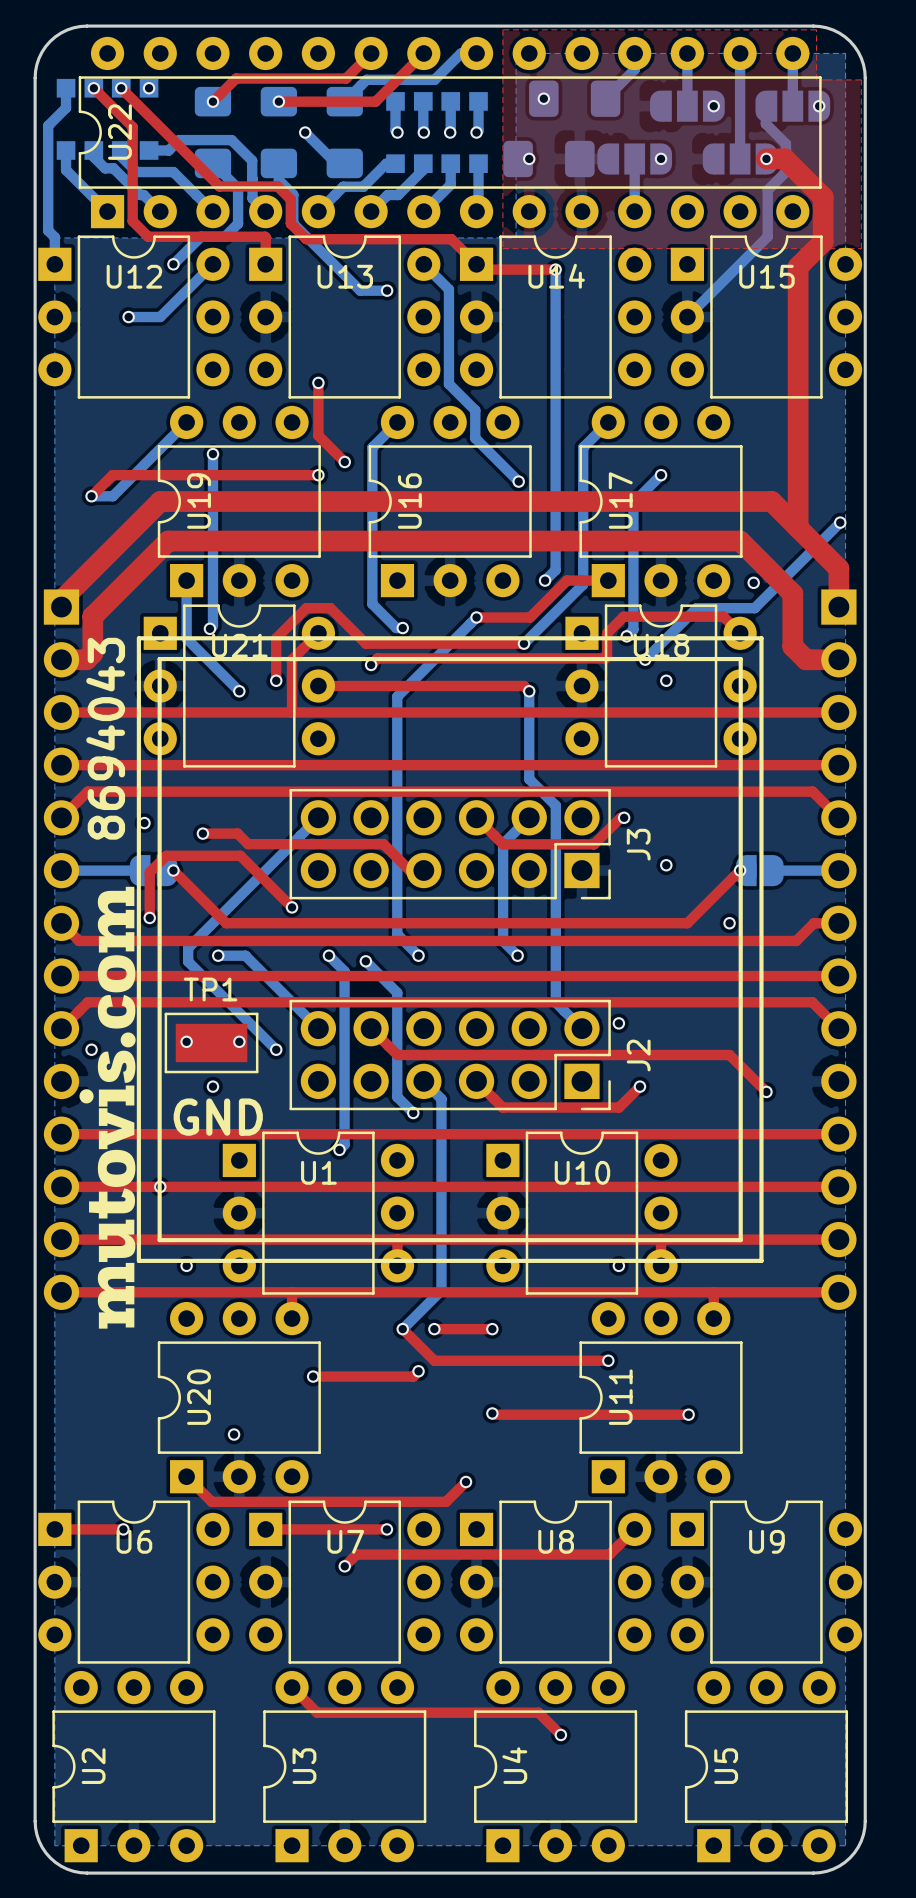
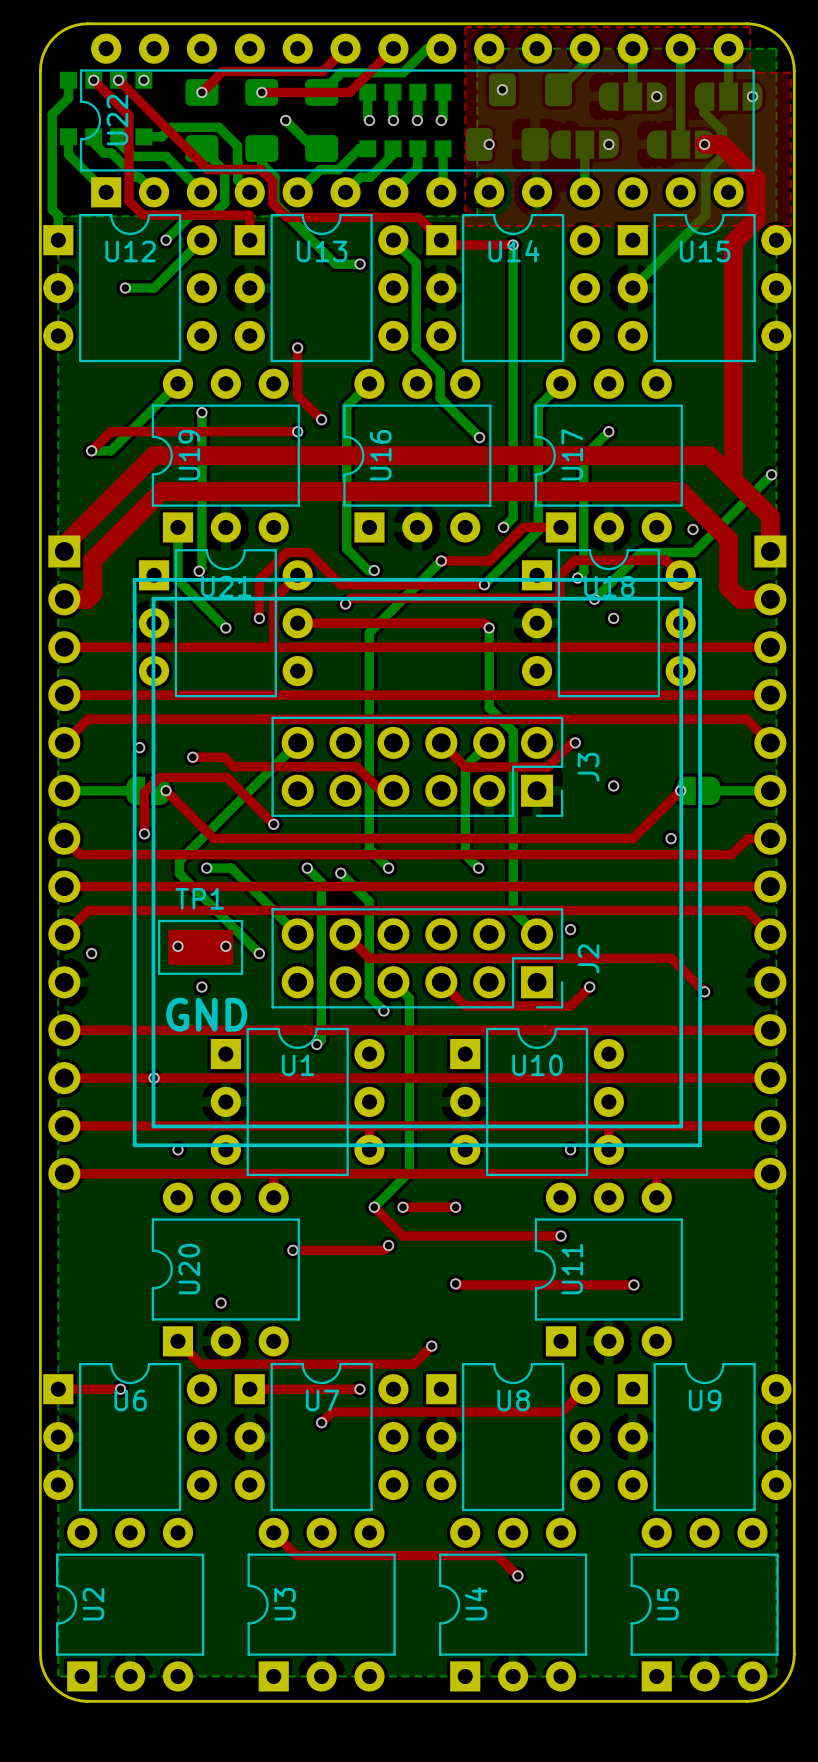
text: 8694043 (105, 738) -> none
drawing: [79, 886, 136, 1329] -> none

